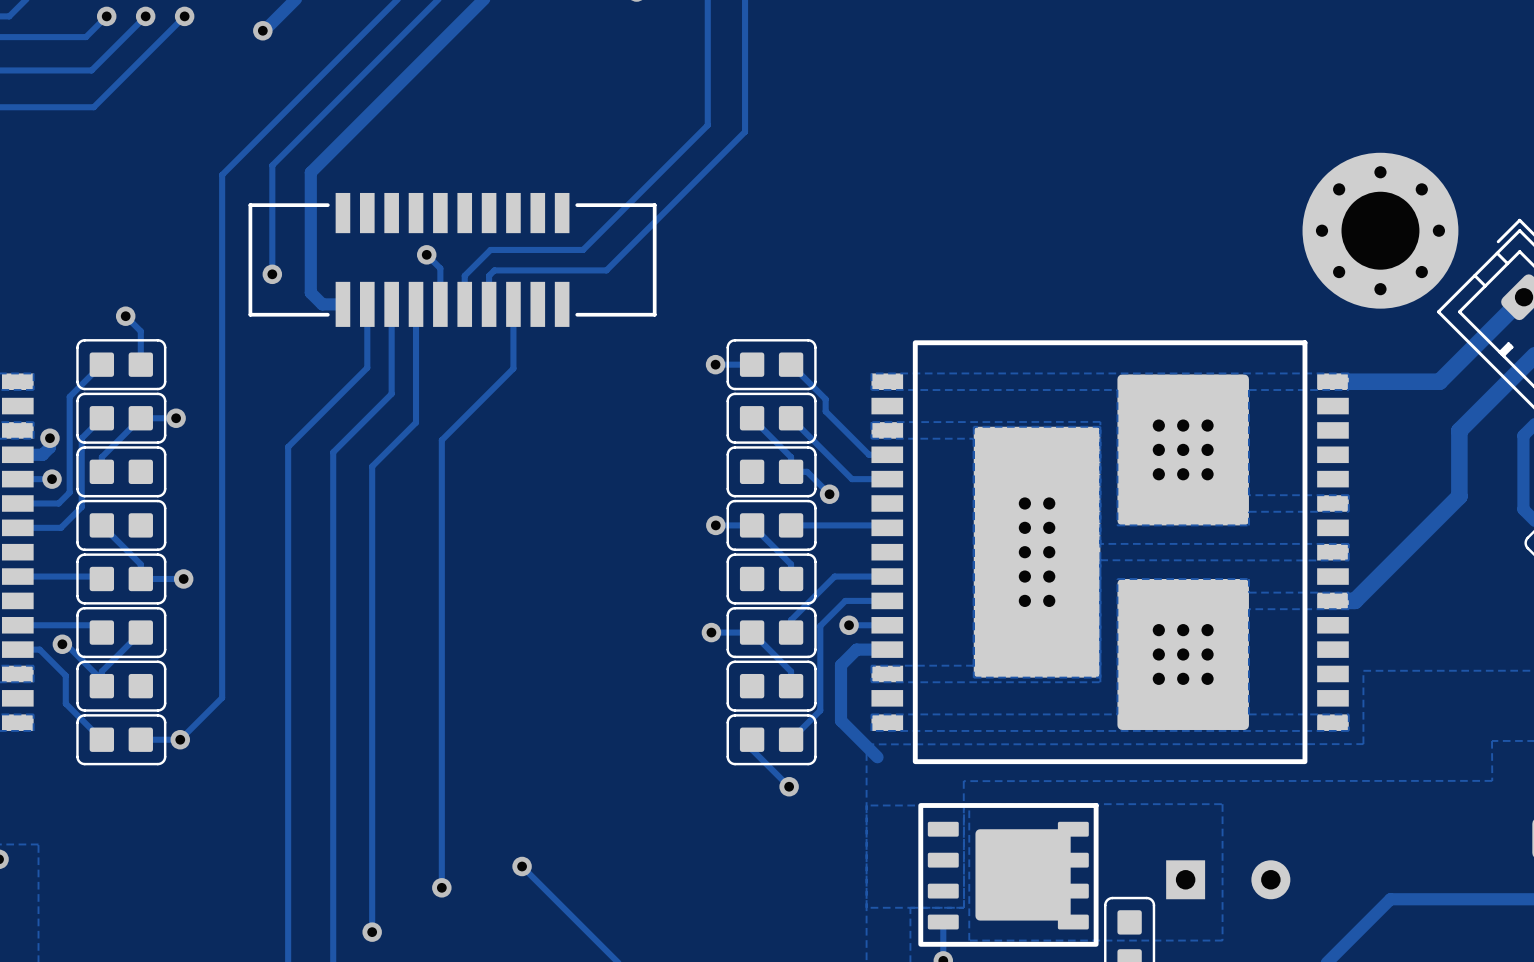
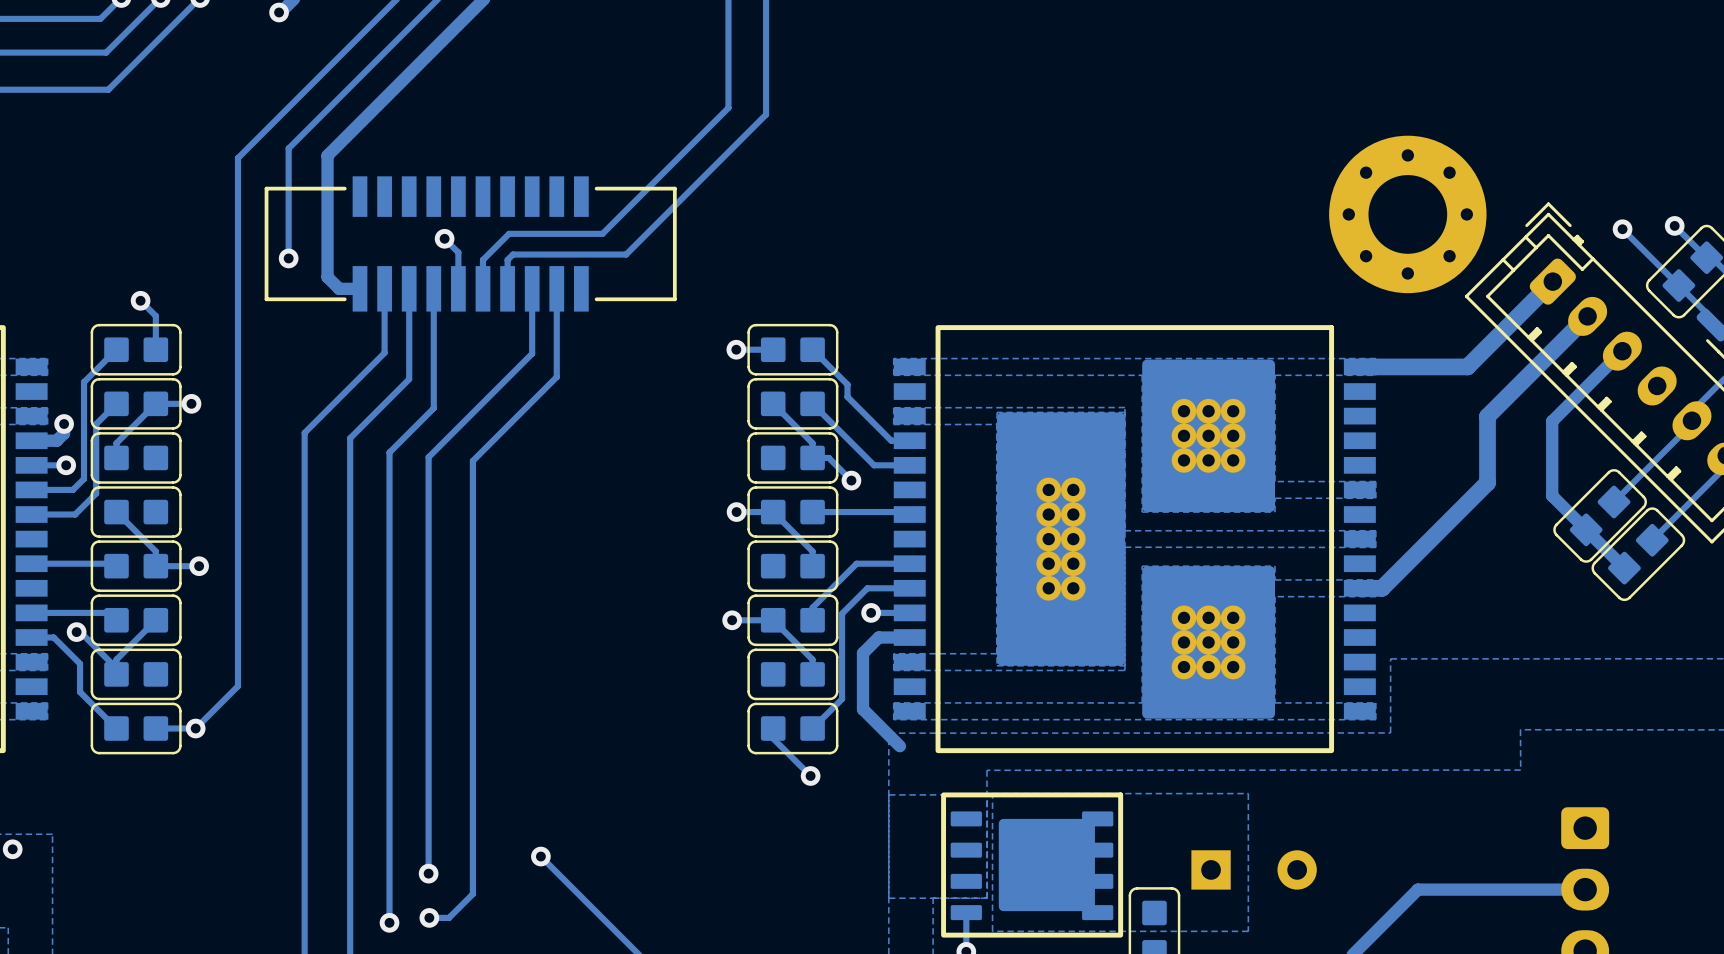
track: none -> (556, 288) (556, 377) (472, 460) (472, 894) (449, 917) (429, 917)
track: (441, 440) (441, 887) -> (459, 425) (428, 457) (428, 873)
via: none -> (428, 873)
via: (441, 887) -> none
via: none -> (429, 917)

